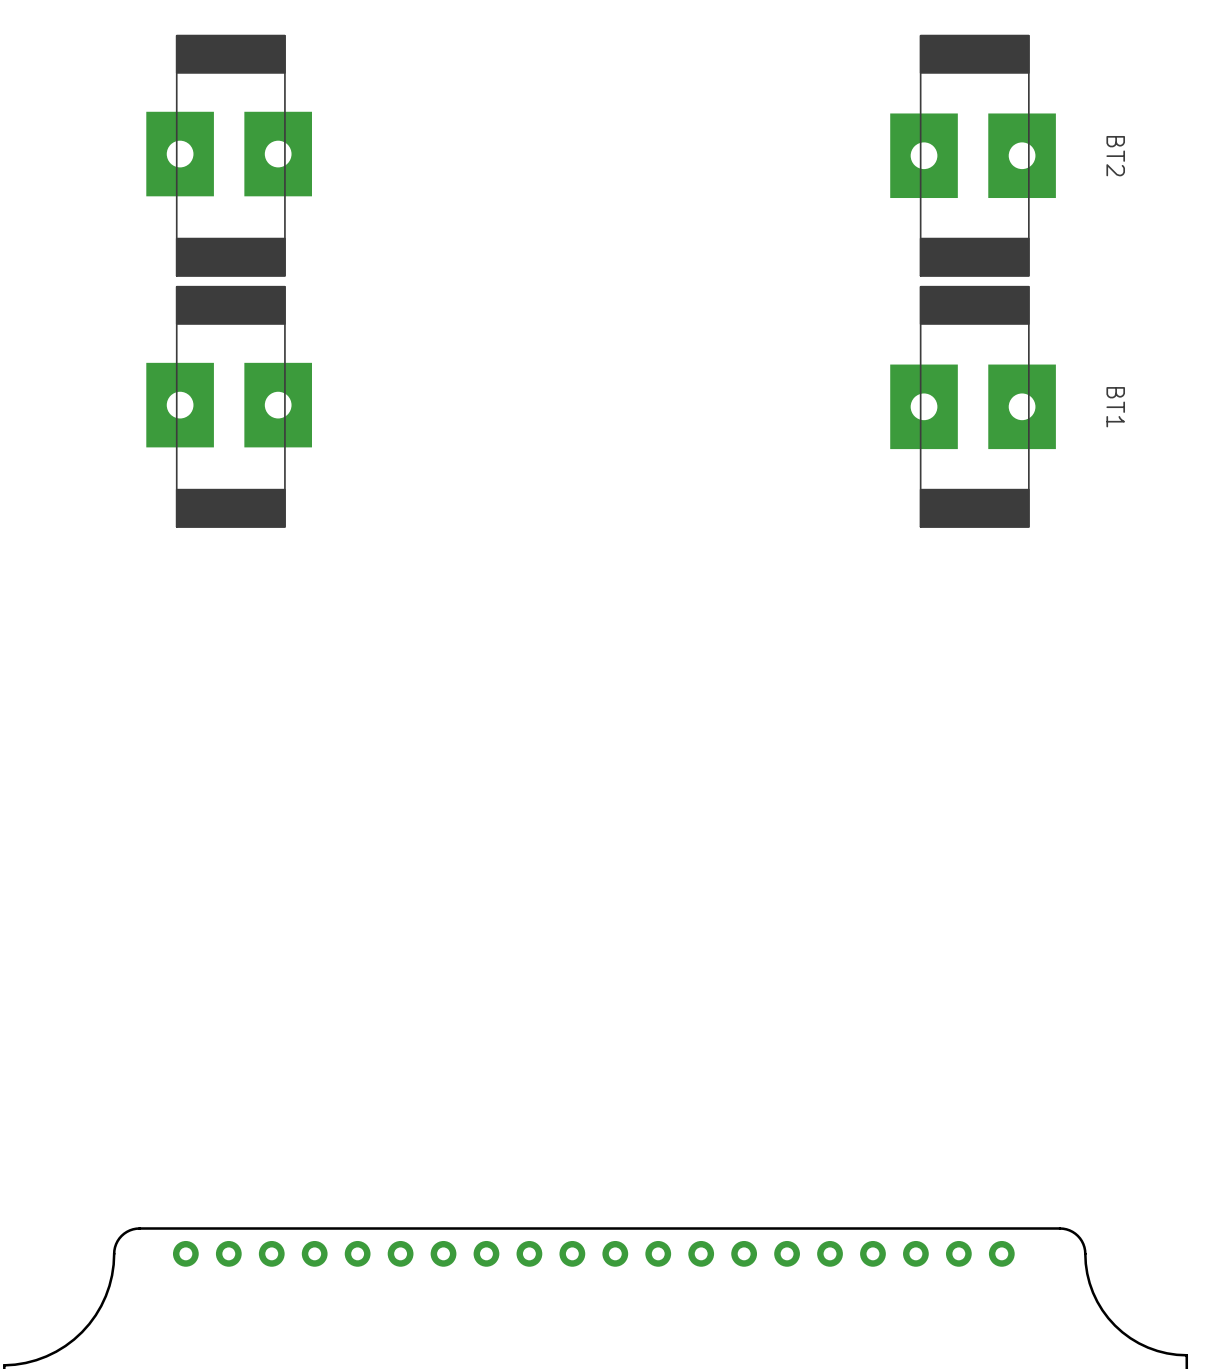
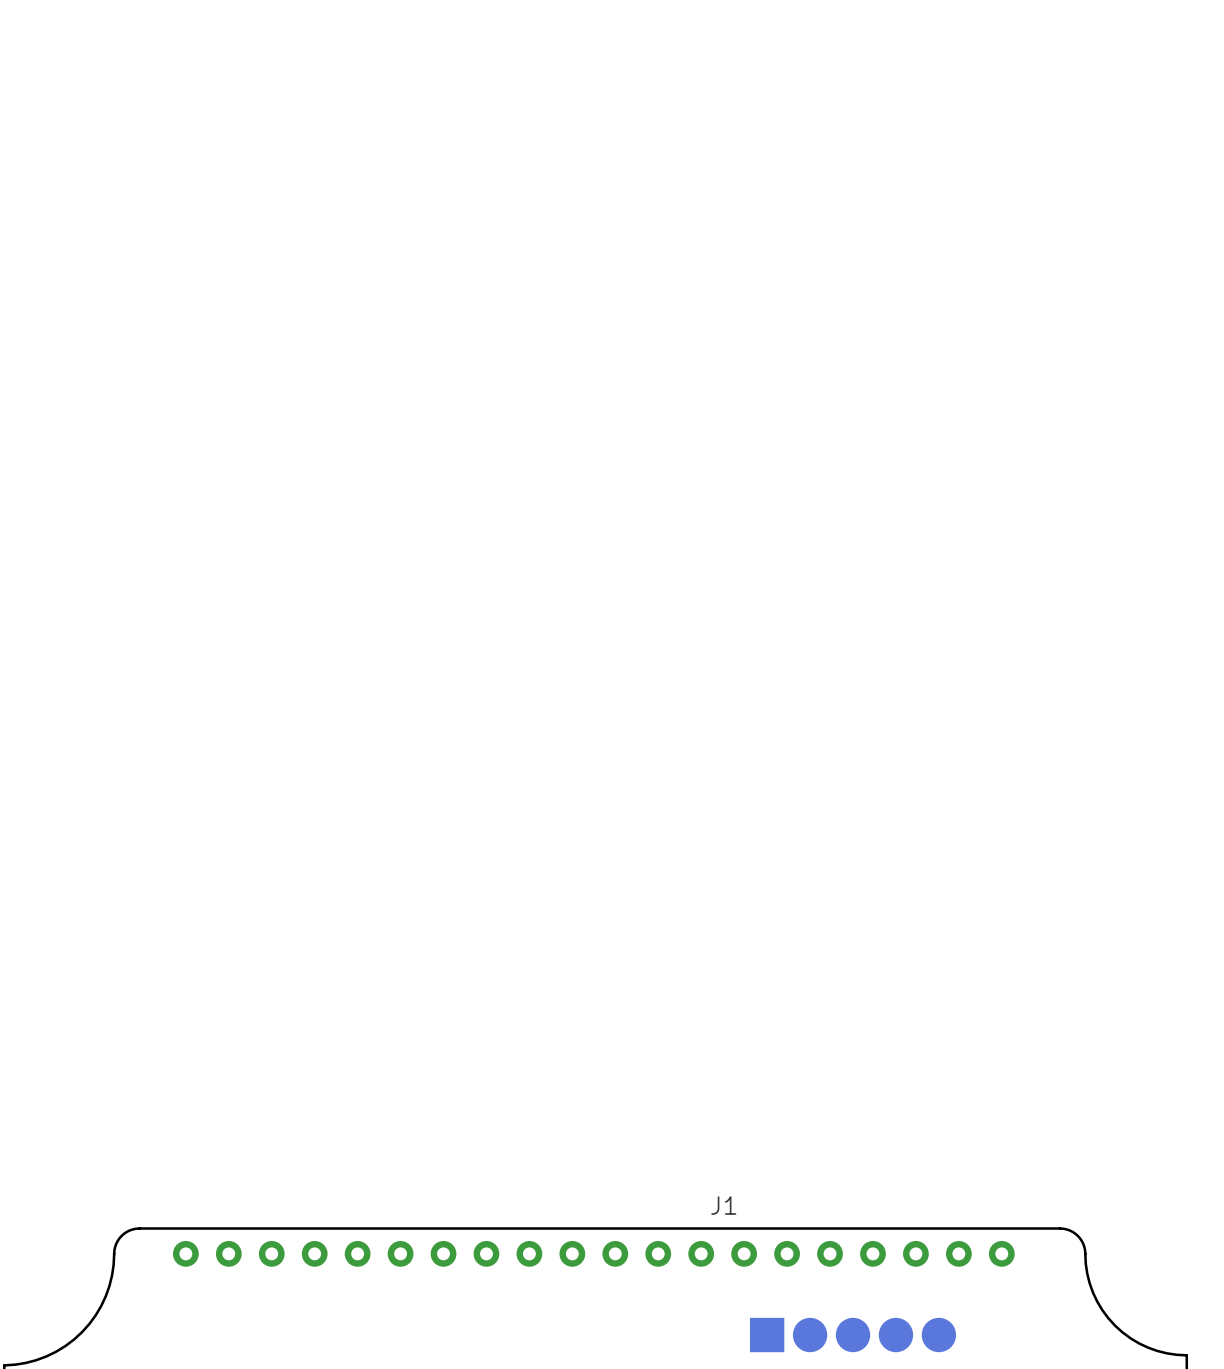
BT2: (601, 155) -> none
BT1: (601, 406) -> none
J1: none -> (853, 1335)

